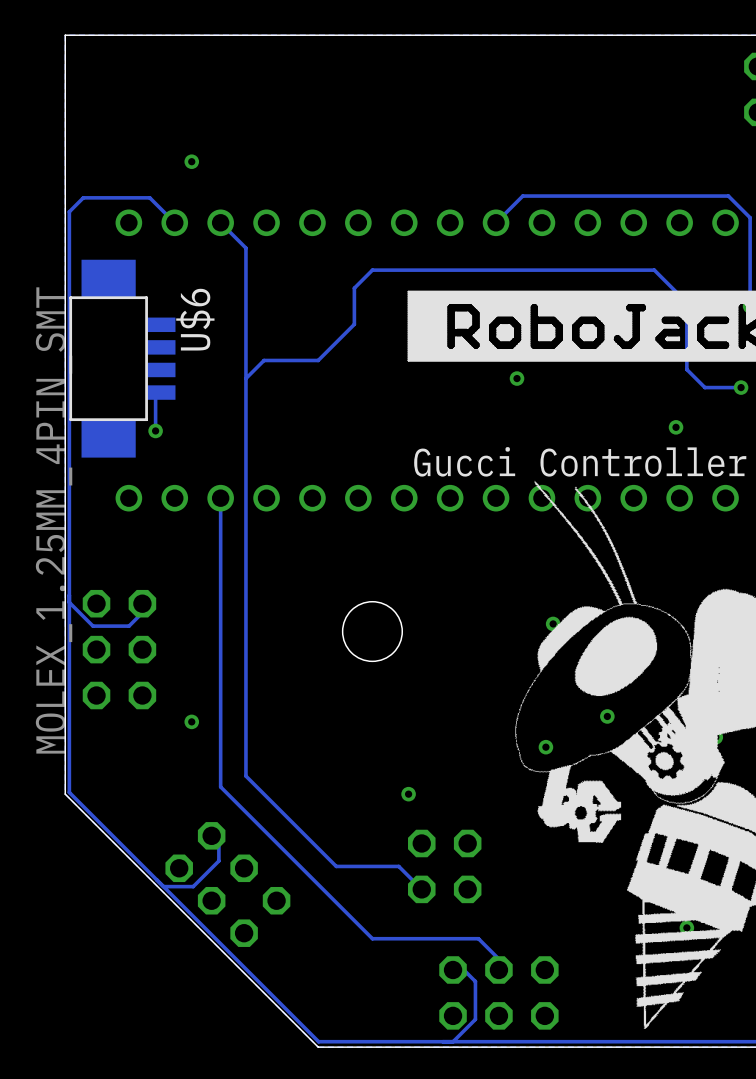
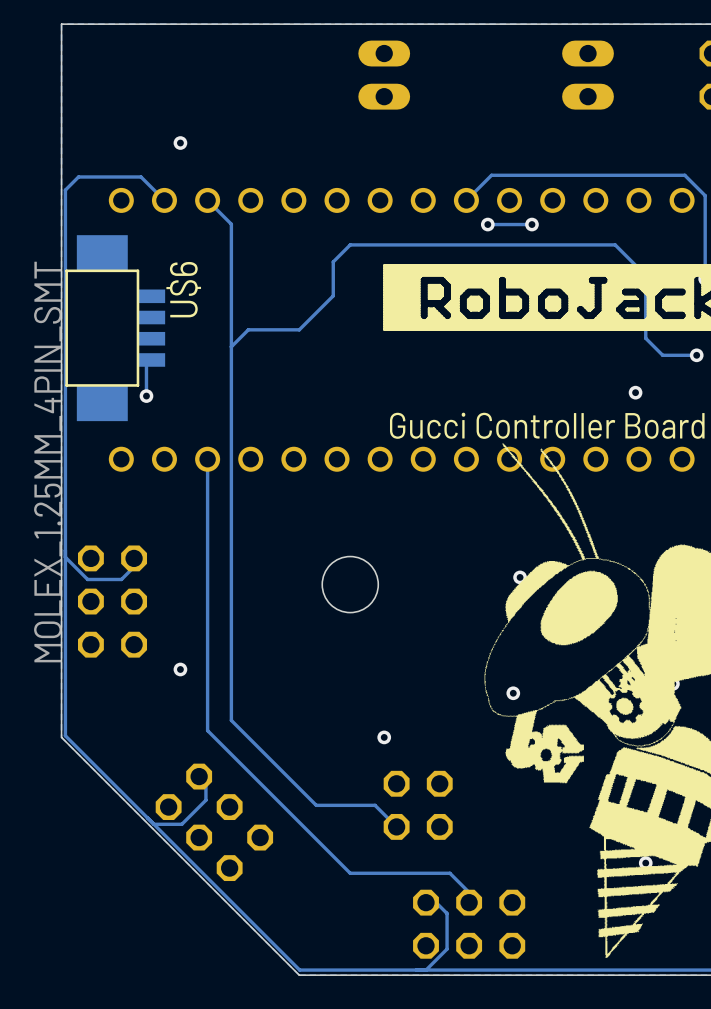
part: none -> (384, 75)
part: none -> (588, 75)
via: none -> (487, 224)
track: none -> (531, 224) (487, 224)
via: none -> (531, 224)
via: (517, 378) -> none
via: (607, 716) -> none

